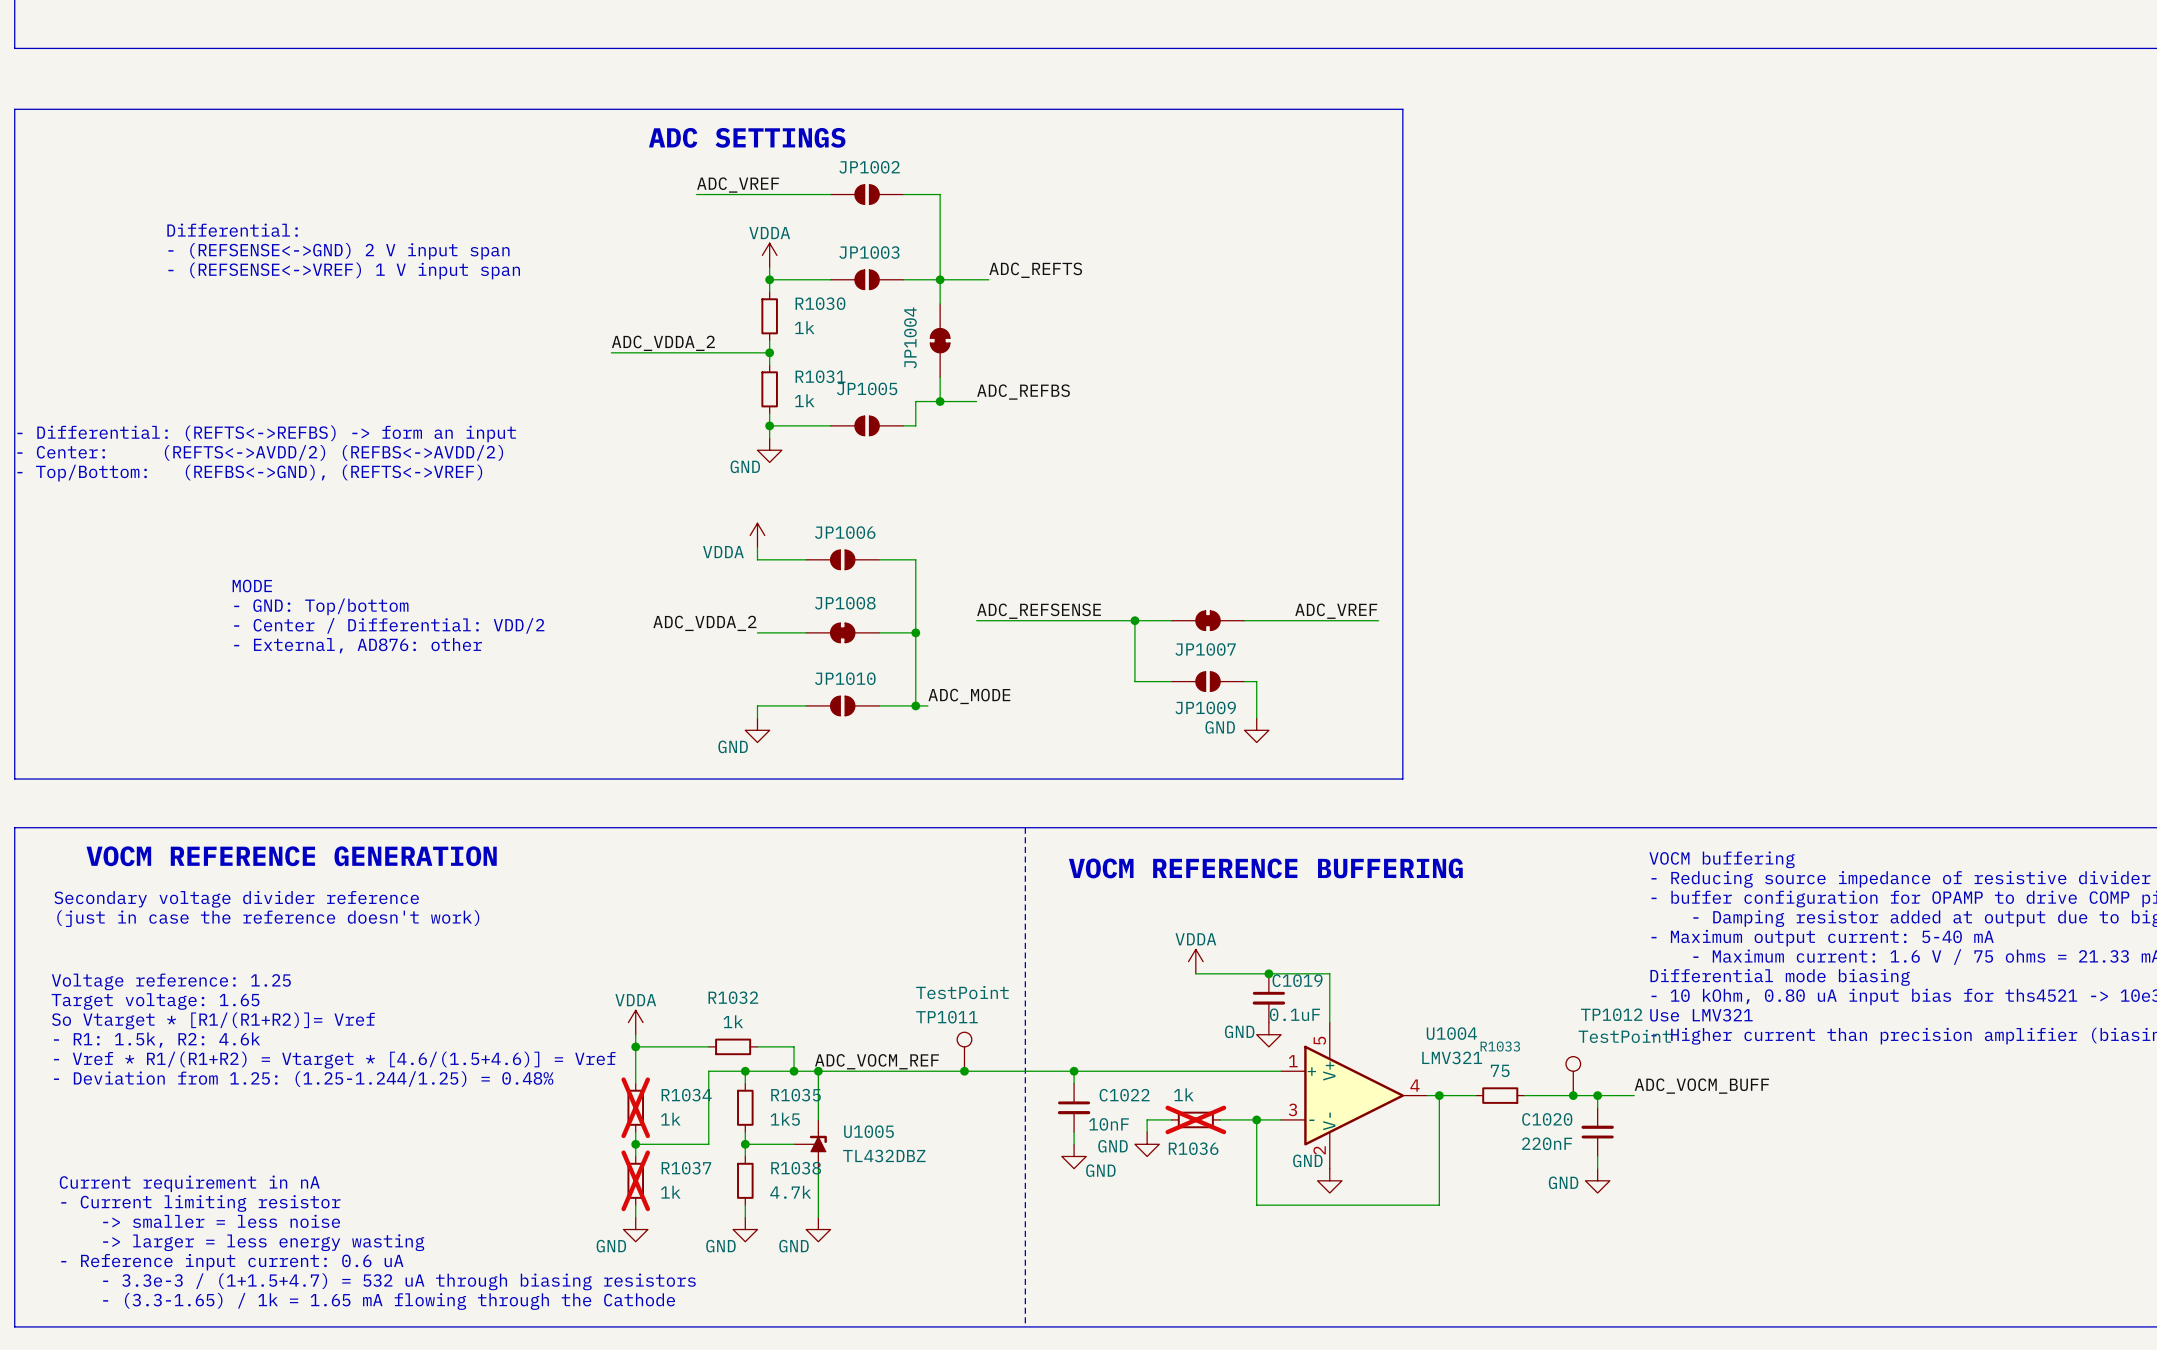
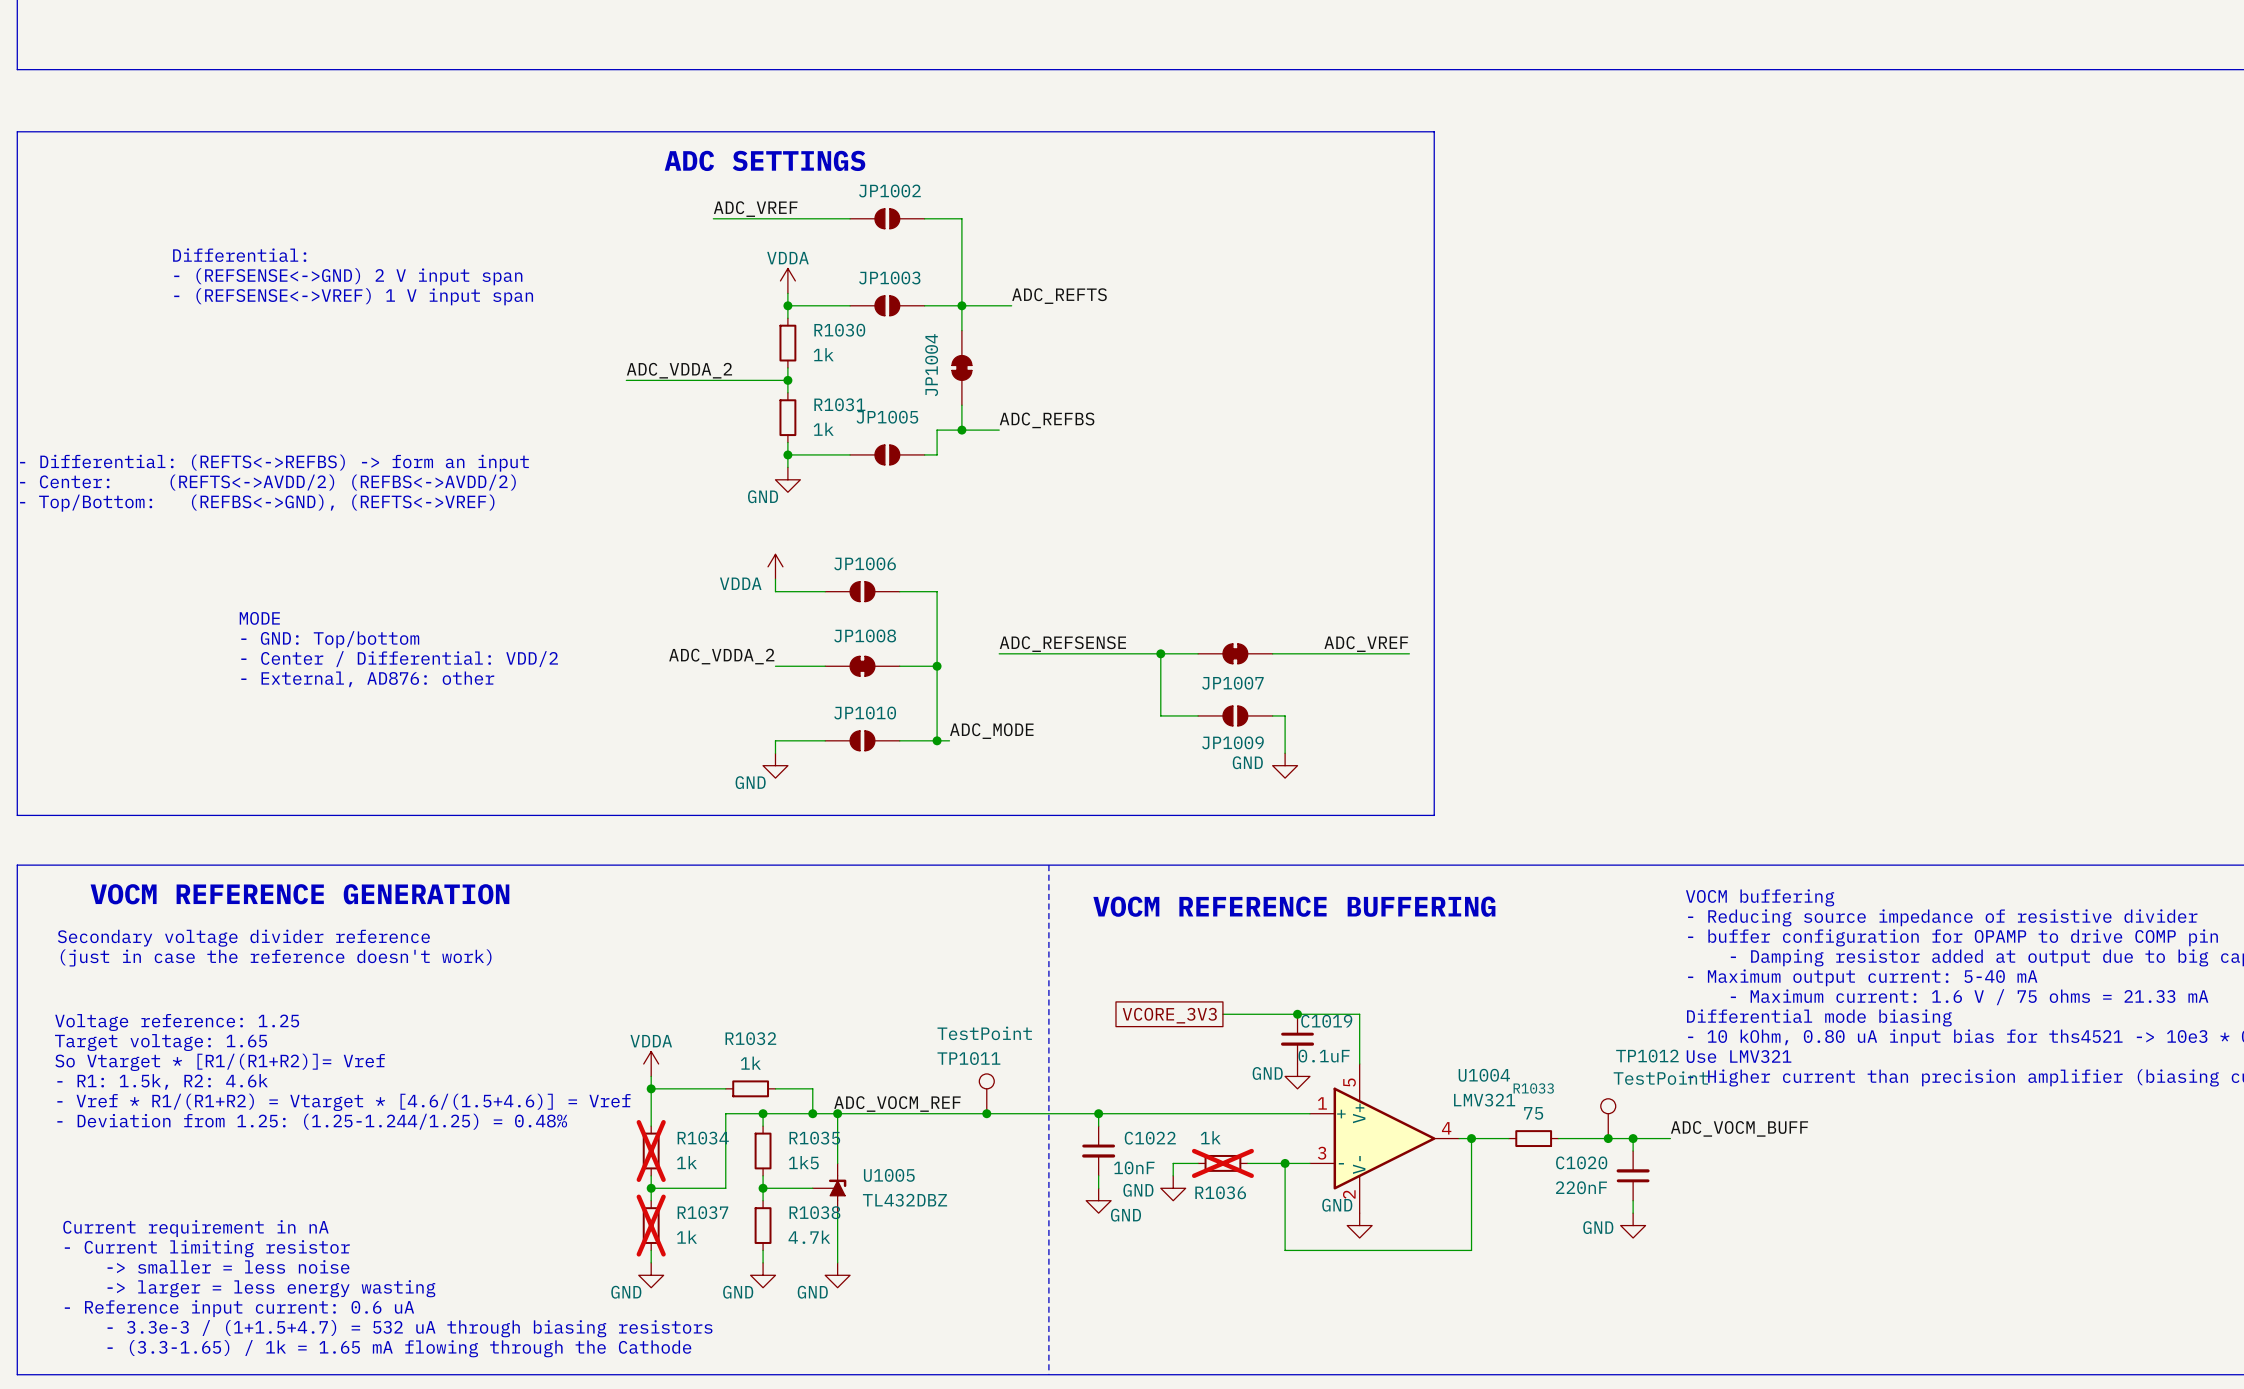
power symbol: VDDA (1195, 961) -> none
global label: none -> VCORE_3V3 (1169, 1015)

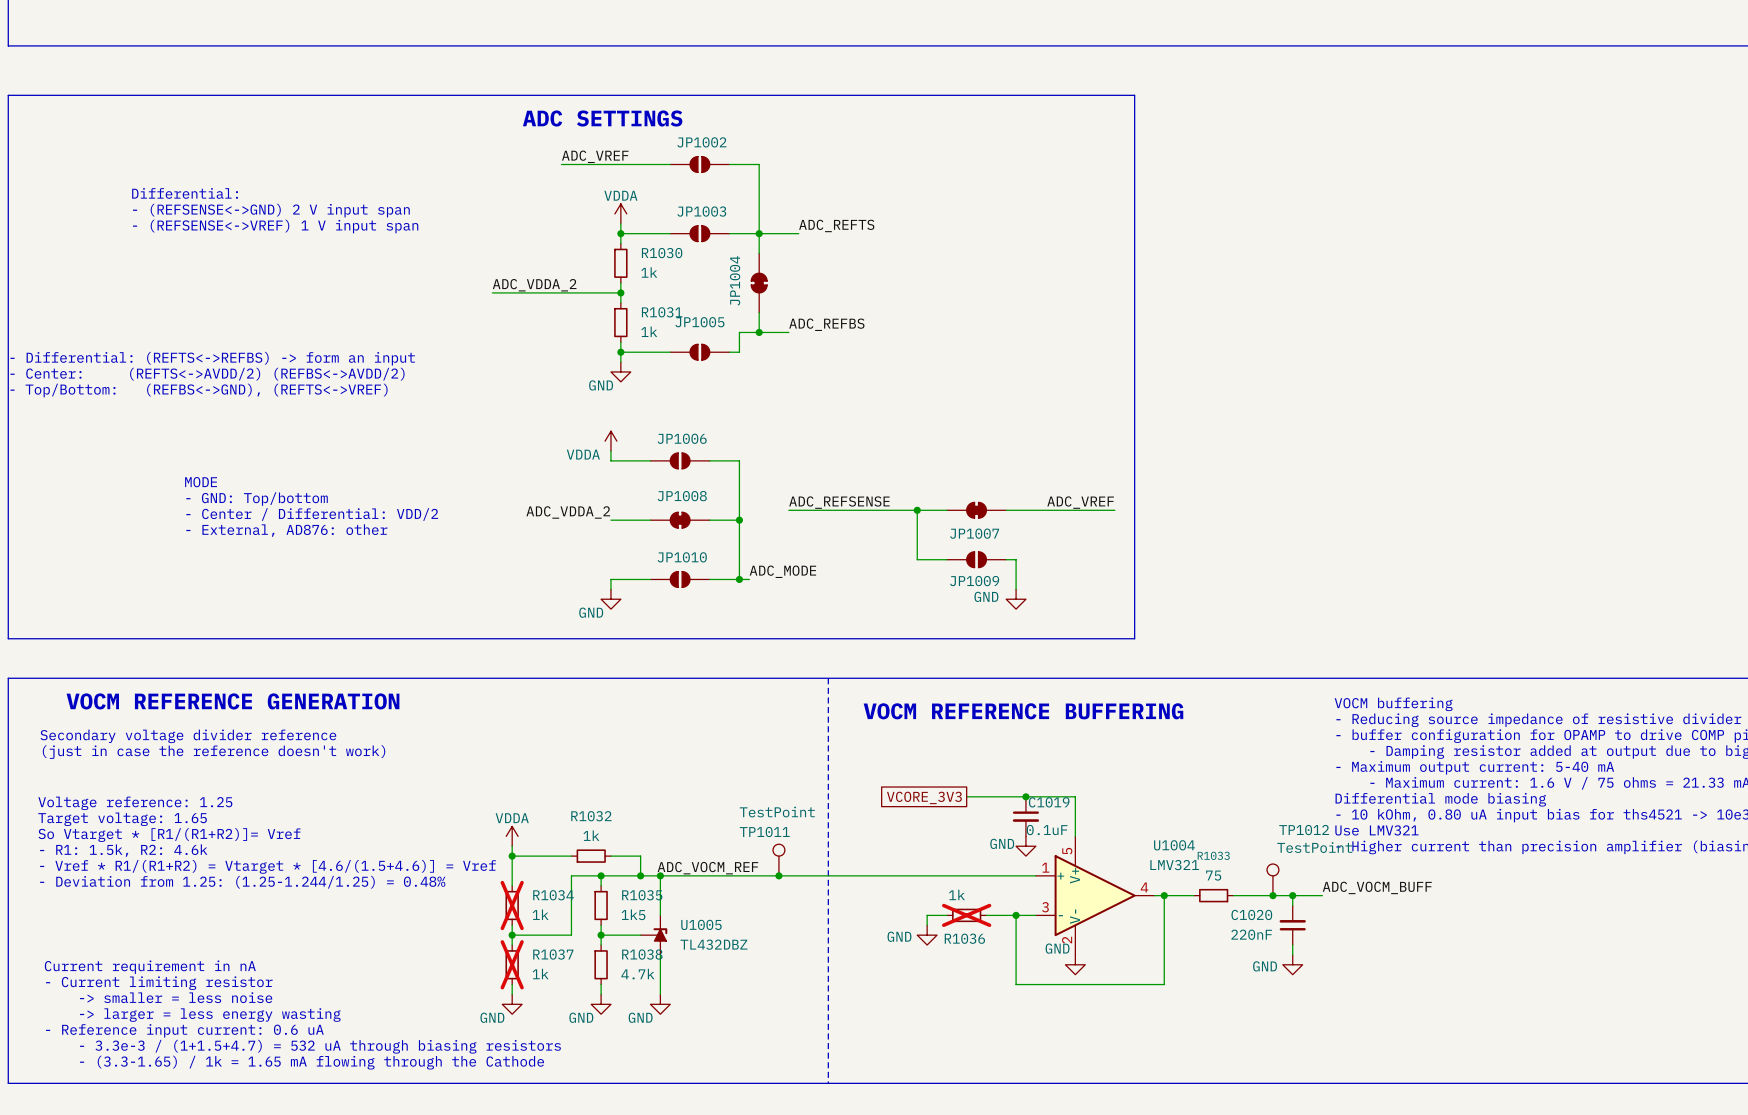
wire: (1098, 1113) (1098, 1126) -> none
junction: (1098, 1113) -> none
C1022: 10nF (1098, 1151) -> none
wire: (1098, 1175) (1098, 1188) -> none
power symbol: GND (1098, 1200) -> none

